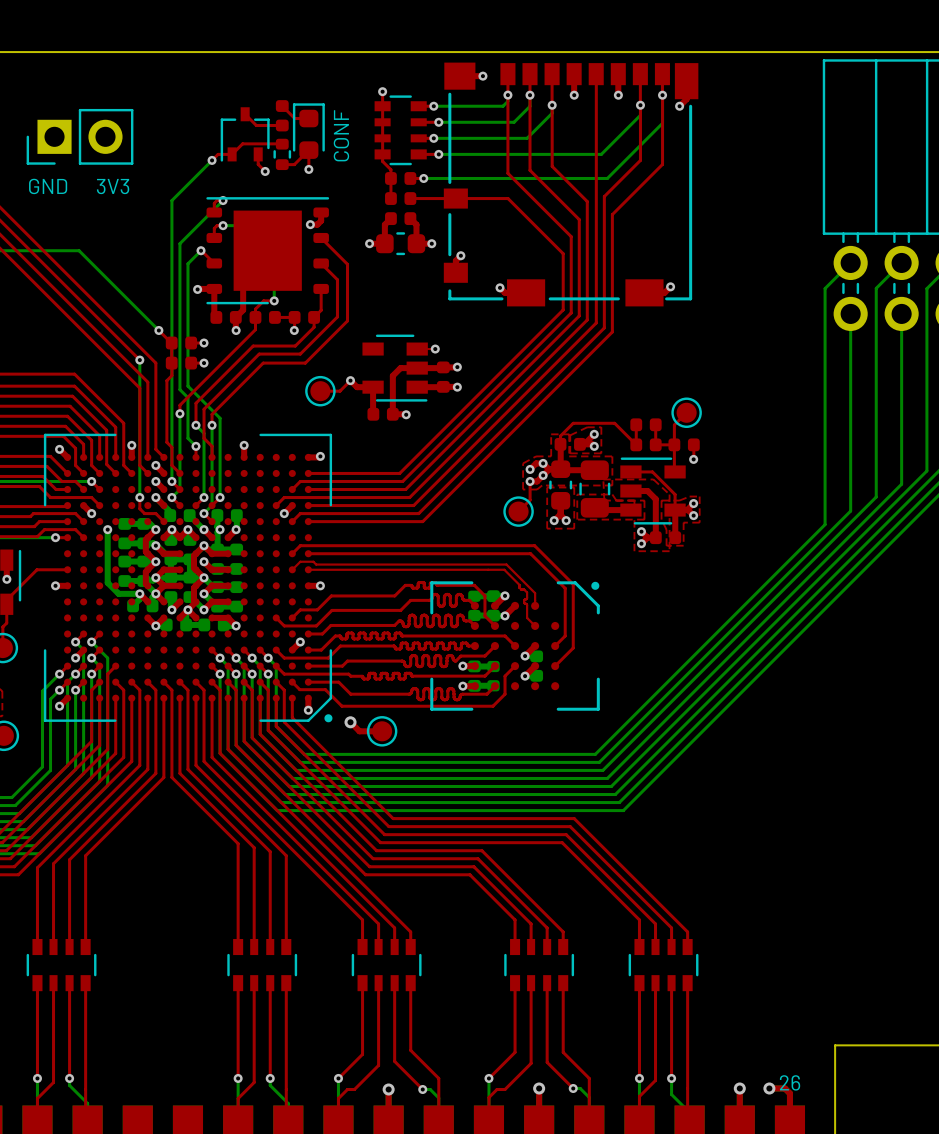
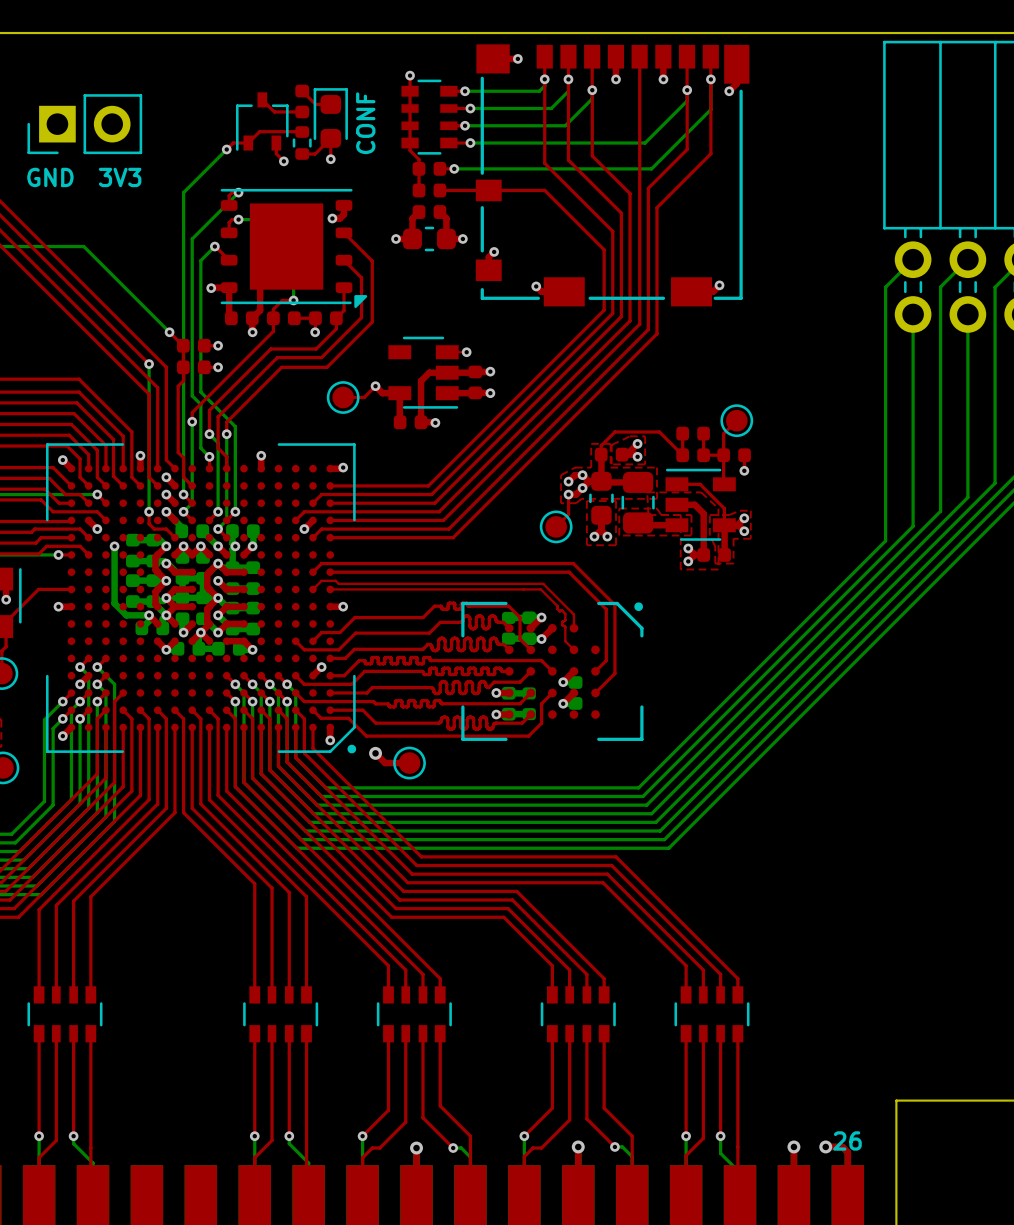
part footprint: [206, 197, 330, 305] -> [220, 188, 368, 309]

